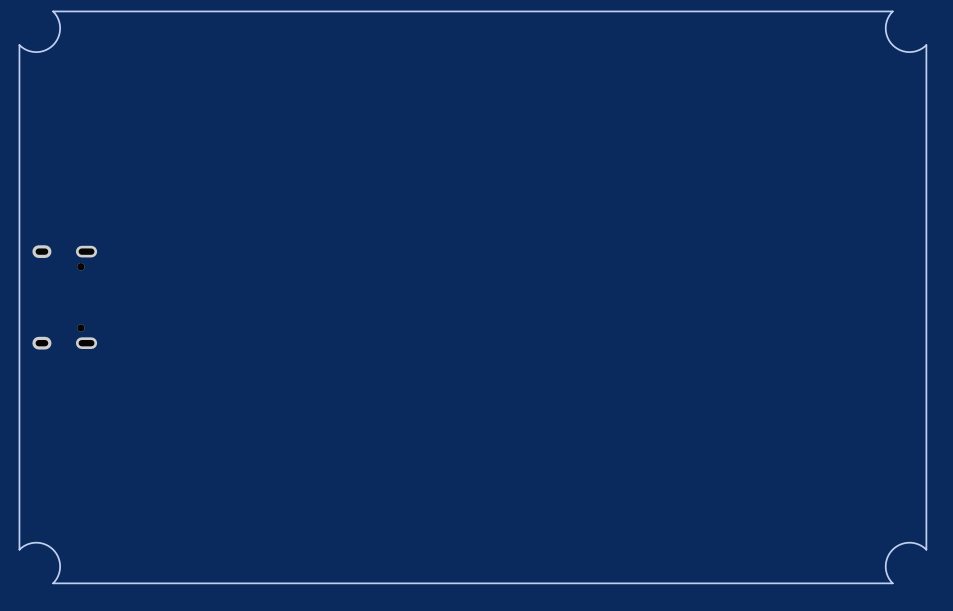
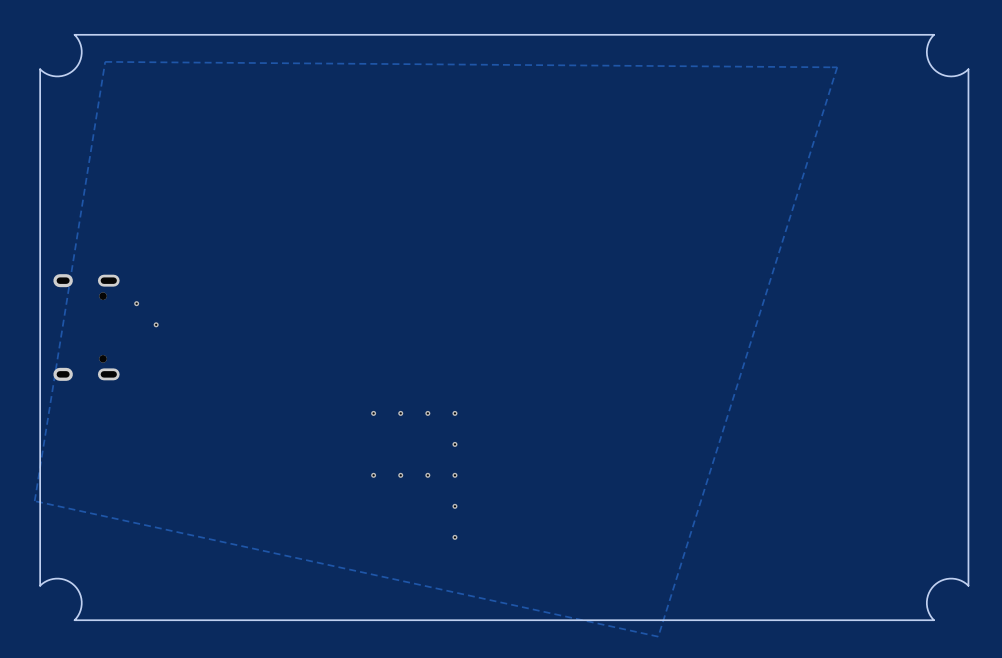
zone outline: none -> (105, 61) (34, 501) (658, 636) (837, 67) (105, 61)
via: none -> (136, 303)
via: none -> (156, 324)
via: none -> (373, 413)
via: none -> (400, 413)
via: none -> (427, 413)
via: none -> (454, 413)
via: none -> (454, 444)
via: none -> (373, 475)
via: none -> (400, 475)
via: none -> (427, 475)
via: none -> (454, 475)
via: none -> (454, 506)
via: none -> (454, 537)

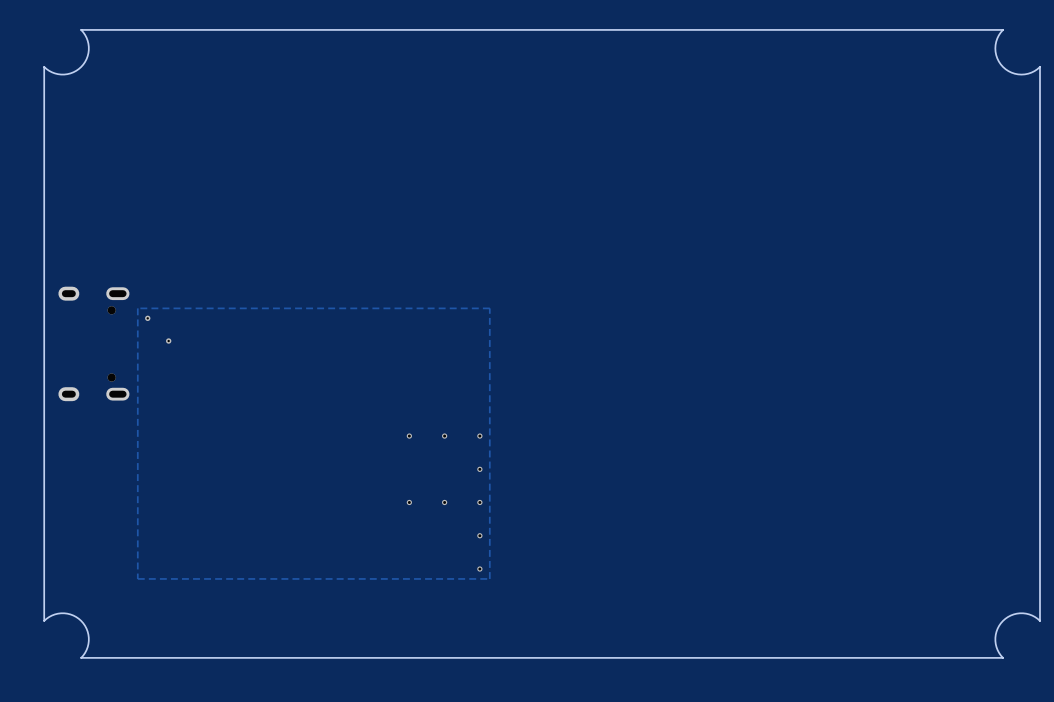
zone outline: (105, 61) (34, 501) (658, 636) (837, 67) (105, 61) -> none
zone outline: none -> (489, 308) (137, 308) (137, 578) (489, 578) (489, 308)
via: (373, 413) -> none
via: none -> (409, 436)
via: (400, 413) -> none
via: none -> (444, 436)
via: (427, 413) -> none
via: none -> (479, 436)
via: (454, 413) -> none
via: none -> (479, 469)
via: (454, 444) -> none
via: (373, 475) -> none
via: none -> (409, 502)
via: (400, 475) -> none
via: none -> (444, 502)
via: (427, 475) -> none
via: none -> (479, 502)
via: (454, 475) -> none
via: none -> (479, 535)
via: (454, 506) -> none
via: none -> (479, 569)
via: (454, 537) -> none

